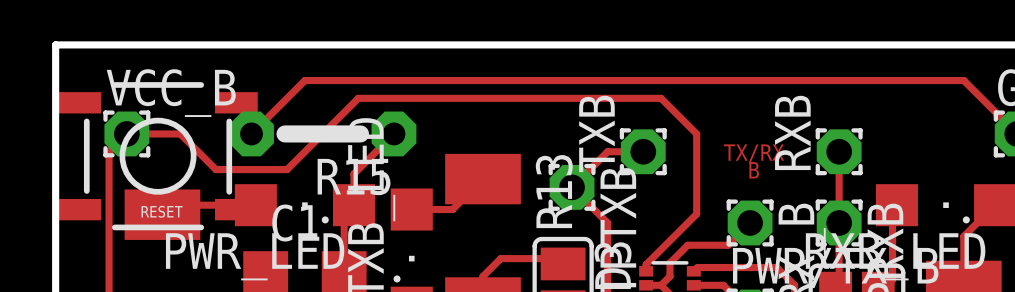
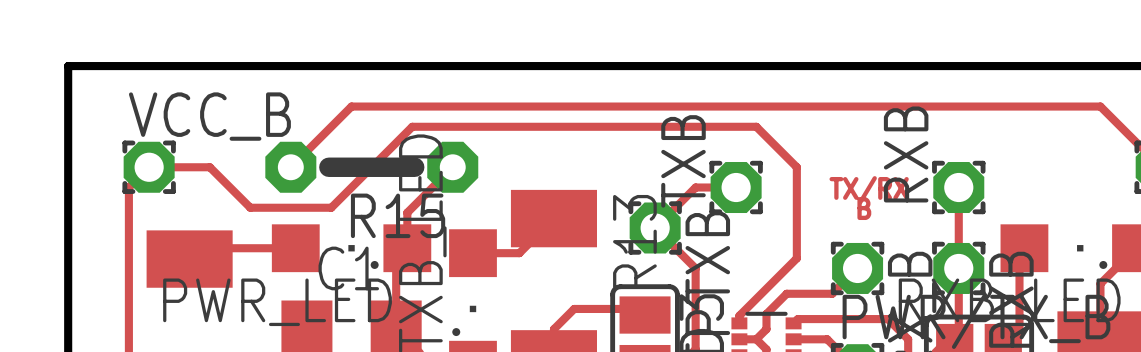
RESET: (158, 156) -> none

